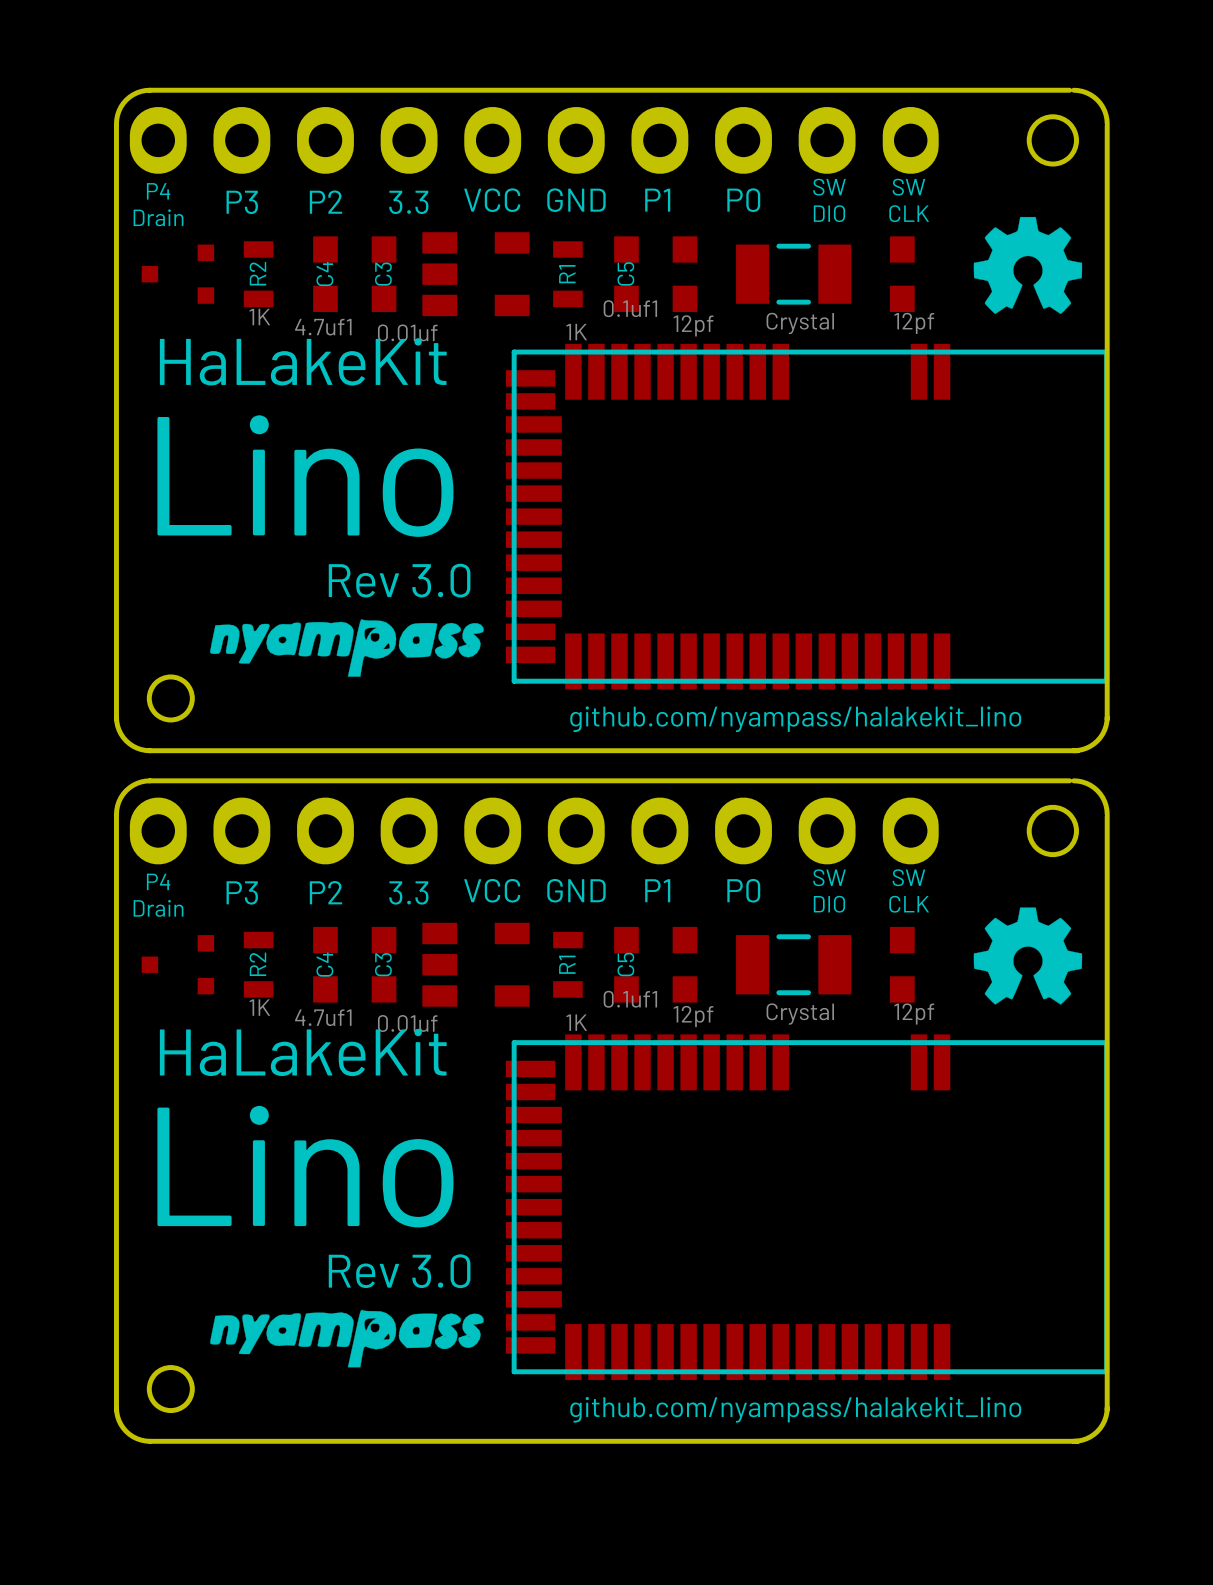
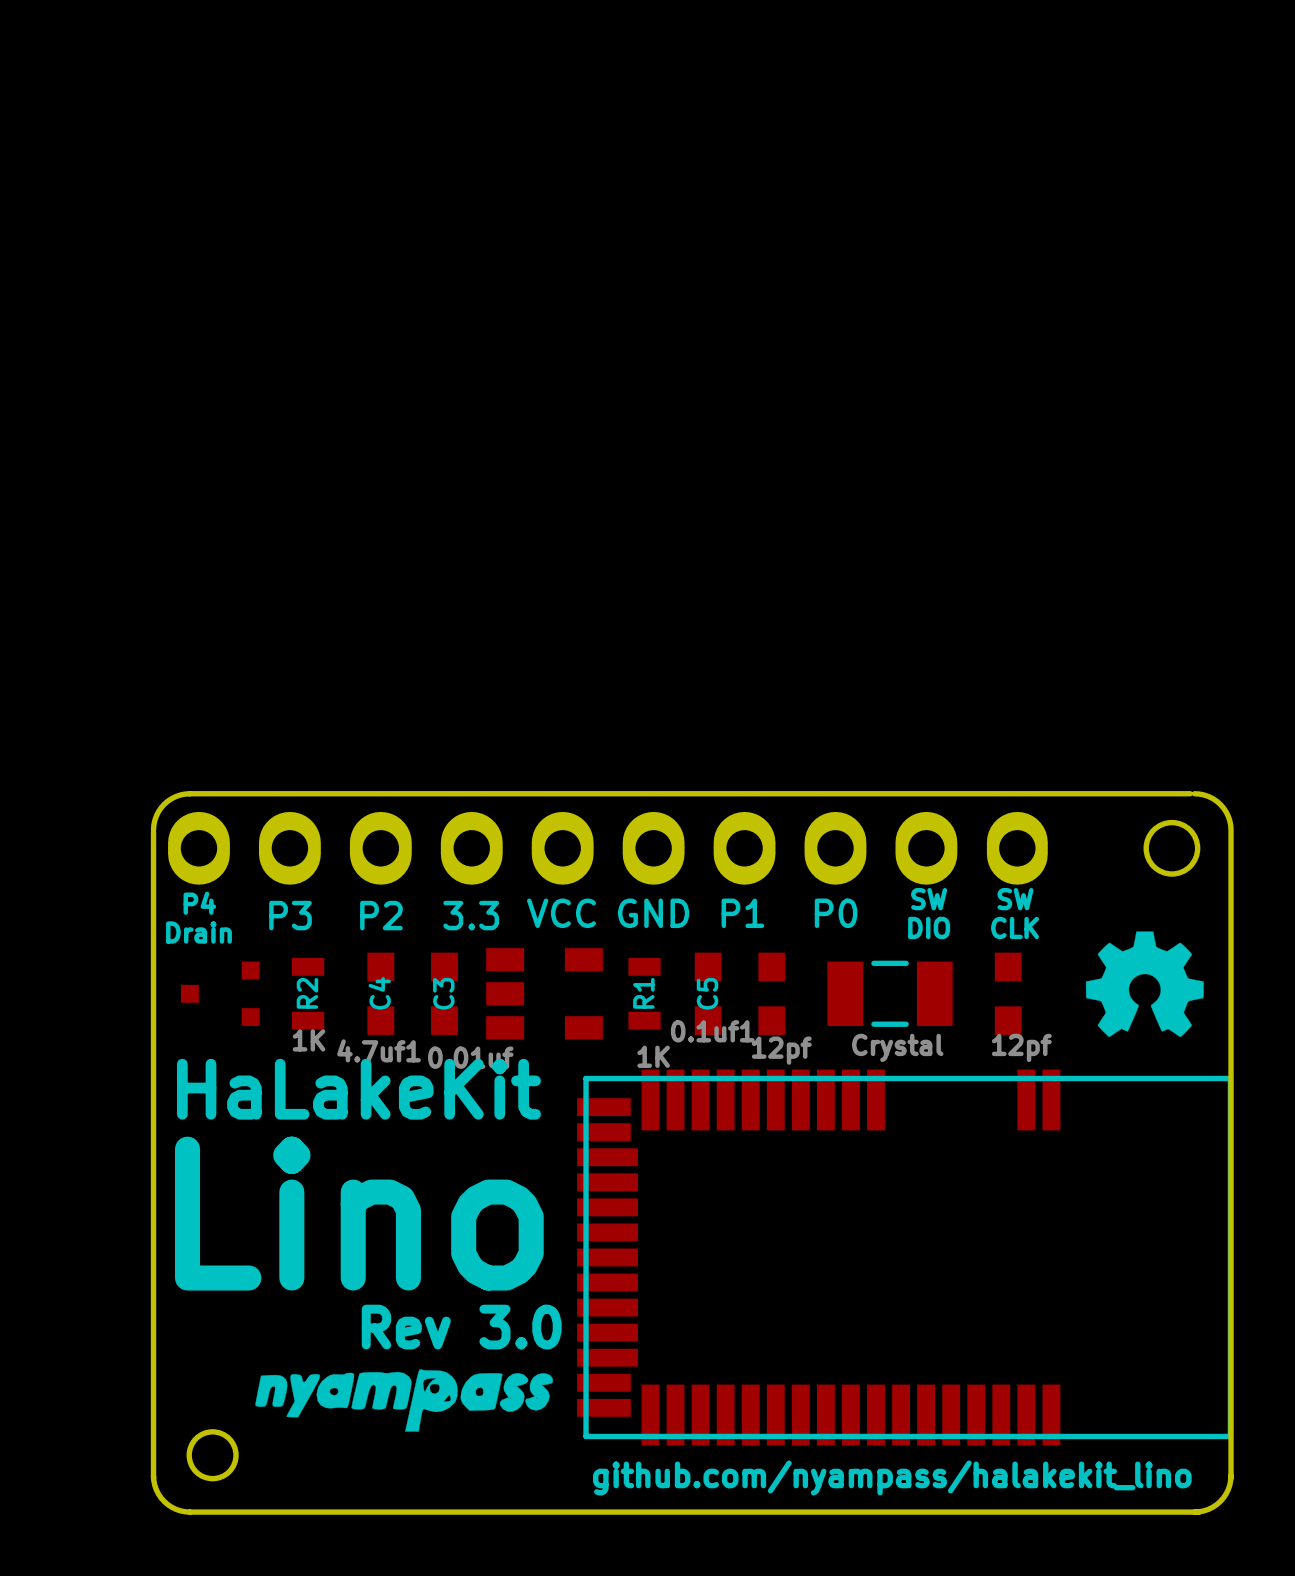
board edge: (1069, 90) (149, 90) (137, 92) (126, 100) (119, 110) (116, 123) -> none
board edge: (1073, 90) (1086, 92) (1097, 100) (1104, 110) (1107, 123) -> none
round board edge: [1026, 114, 1079, 167] -> none
board edge: (116, 125) (116, 719) -> none
board edge: (1107, 125) (1107, 719) -> none
part: (534, 140) -> none
text: SW (829, 187) -> none
text: SW (908, 187) -> none
text: P4 (158, 191) -> none
text: VCC (492, 200) -> none
text: GND (576, 200) -> none
text: P1 (657, 200) -> none
text: P0 (743, 200) -> none
text: P3 (242, 202) -> none
text: P2 (325, 202) -> none
text: 3.3 (408, 202) -> none
text: DIO (829, 213) -> none
text: CLK (909, 213) -> none
drawing: [973, 216, 1083, 314] -> none
text: Drain (158, 217) -> none
part: (177, 274) -> none
R2: 1K (258, 274) -> none
C4: 4.7uf1 (325, 274) -> none
C3: 0.01uf (384, 274) -> none
part: (475, 274) -> none
R1: 1K (567, 274) -> none
C5: 0.1uf1 (626, 274) -> none
part: 12pf (684, 274) -> none
part: Crystal (793, 274) -> none
part: 12pf (902, 274) -> none
text: HaLakeKit (303, 361) -> none
text: Lino (305, 476) -> none
part: (807, 516) -> none
text: Rev 3.0 (399, 580) -> none
drawing: [210, 619, 484, 677] -> none
round board edge: [146, 674, 195, 723] -> none
board edge: (116, 717) (119, 730) (126, 740) (137, 748) (149, 750) (1077, 750) -> none
board edge: (1107, 717) (1104, 730) (1097, 740) (1086, 748) (1073, 750) -> none
text: github.com/nyampass/halakekit_lino (795, 719) -> none

